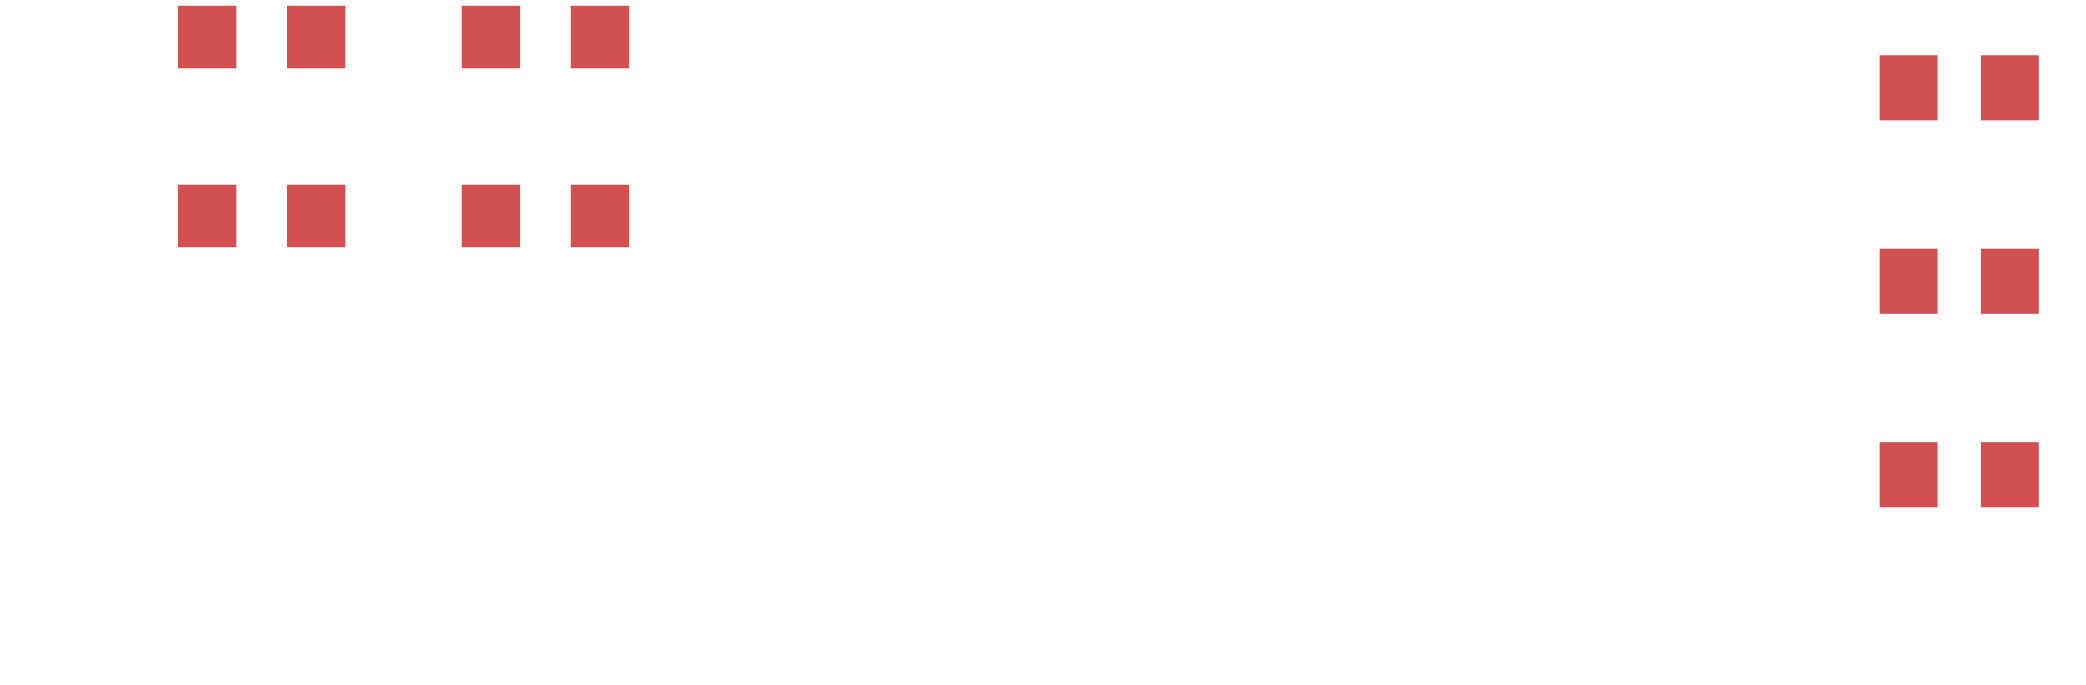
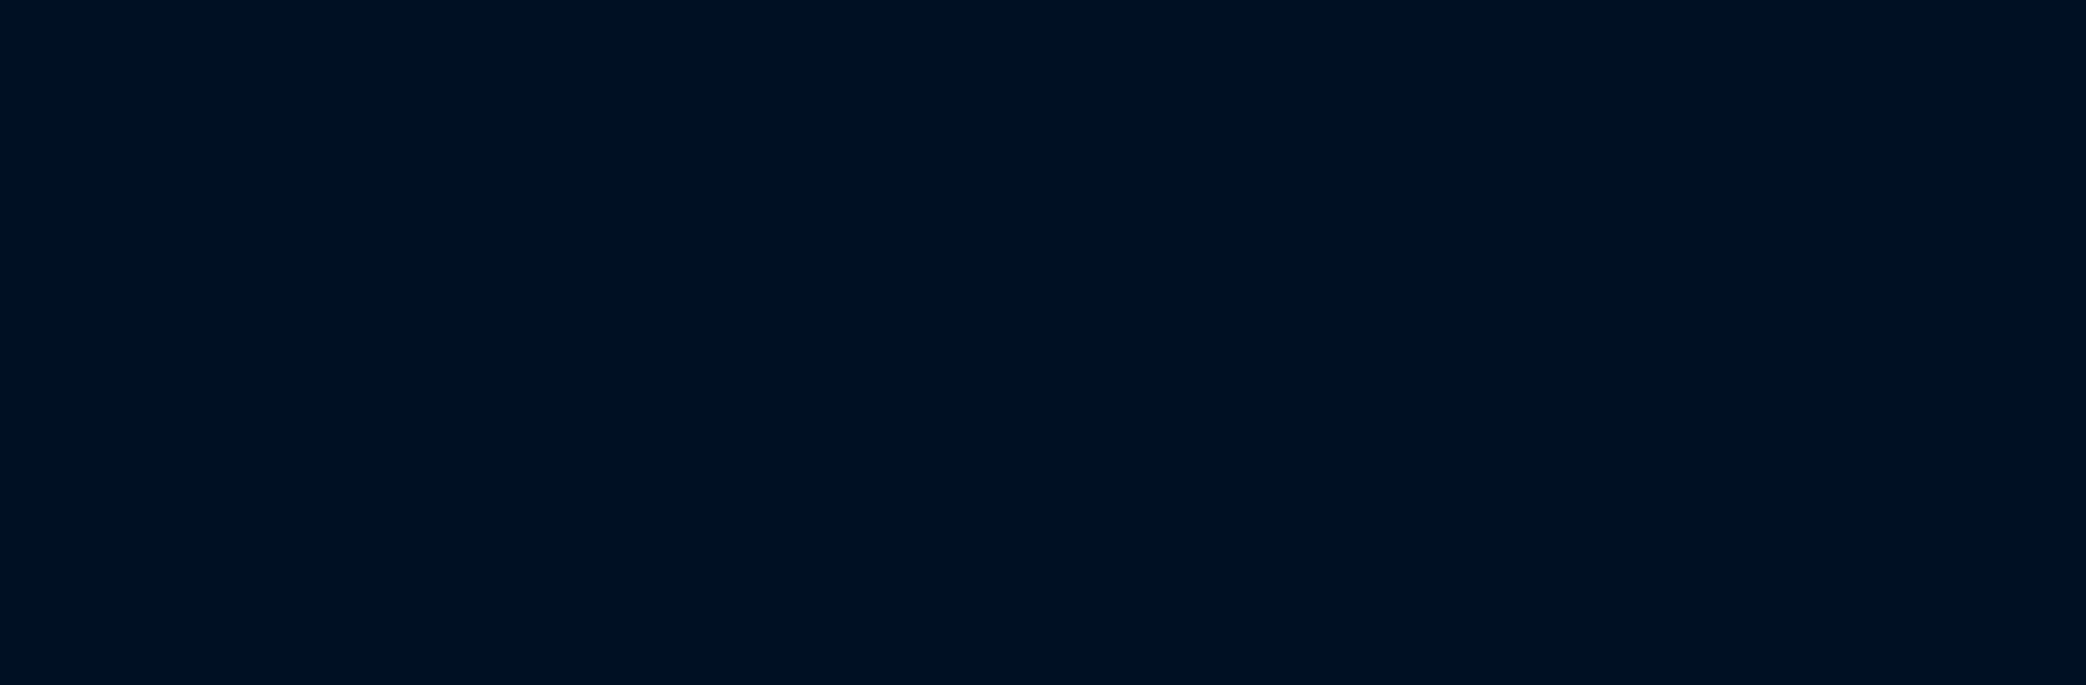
part: (261, 37) -> none
part: (545, 37) -> none
part: (1959, 87) -> none
part: (261, 215) -> none
part: (545, 215) -> none
part: (1959, 281) -> none
part: (1959, 474) -> none

